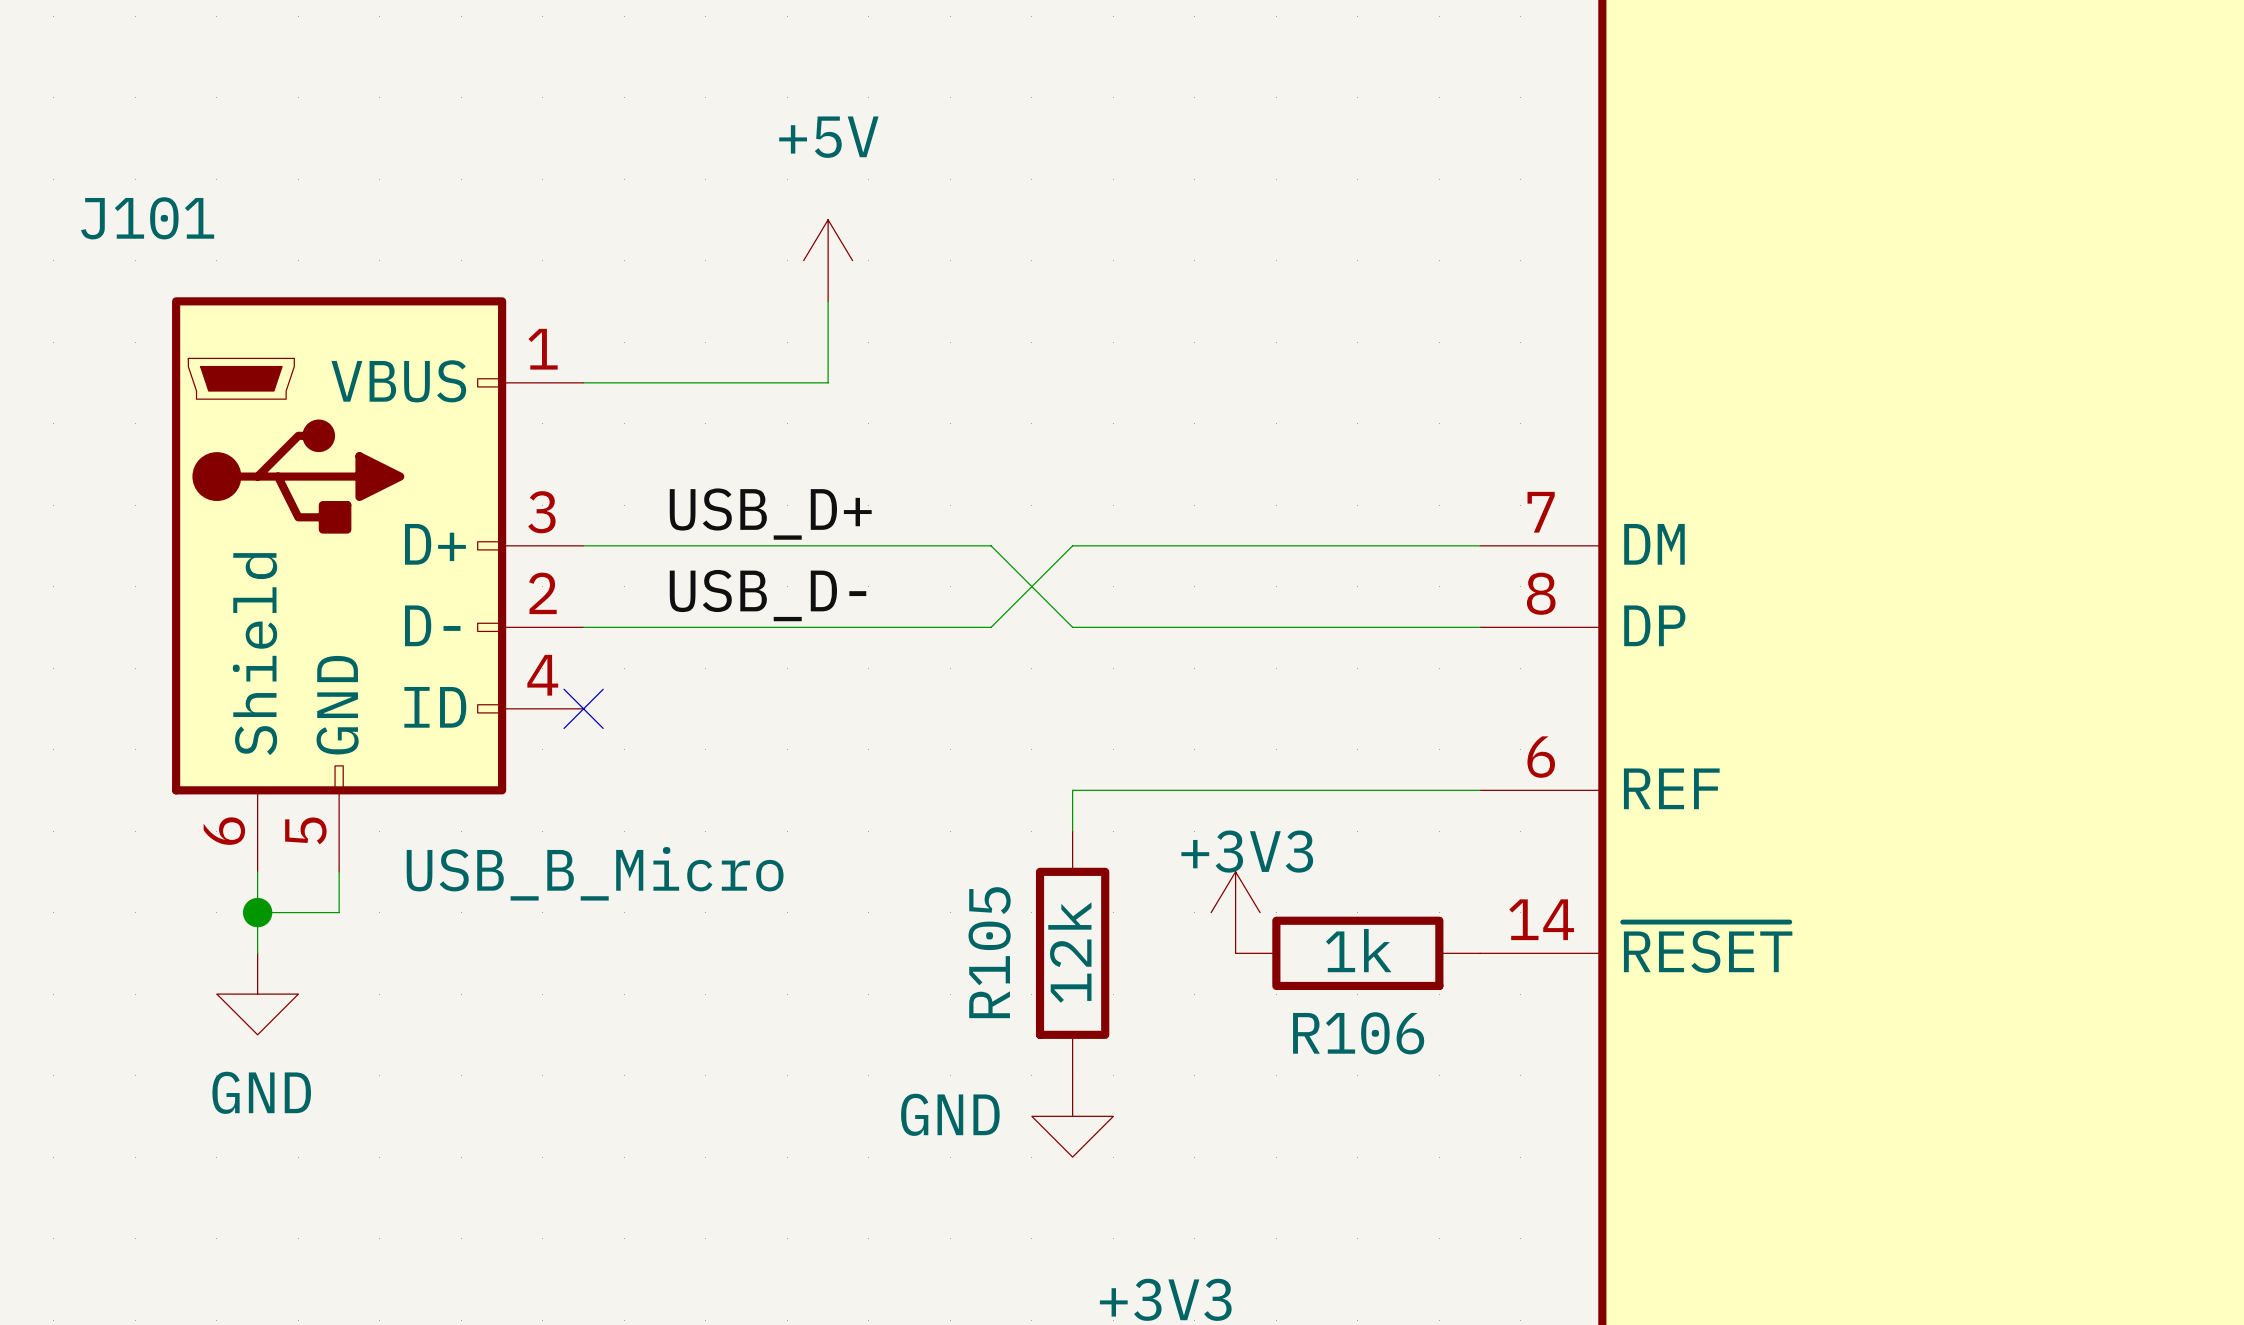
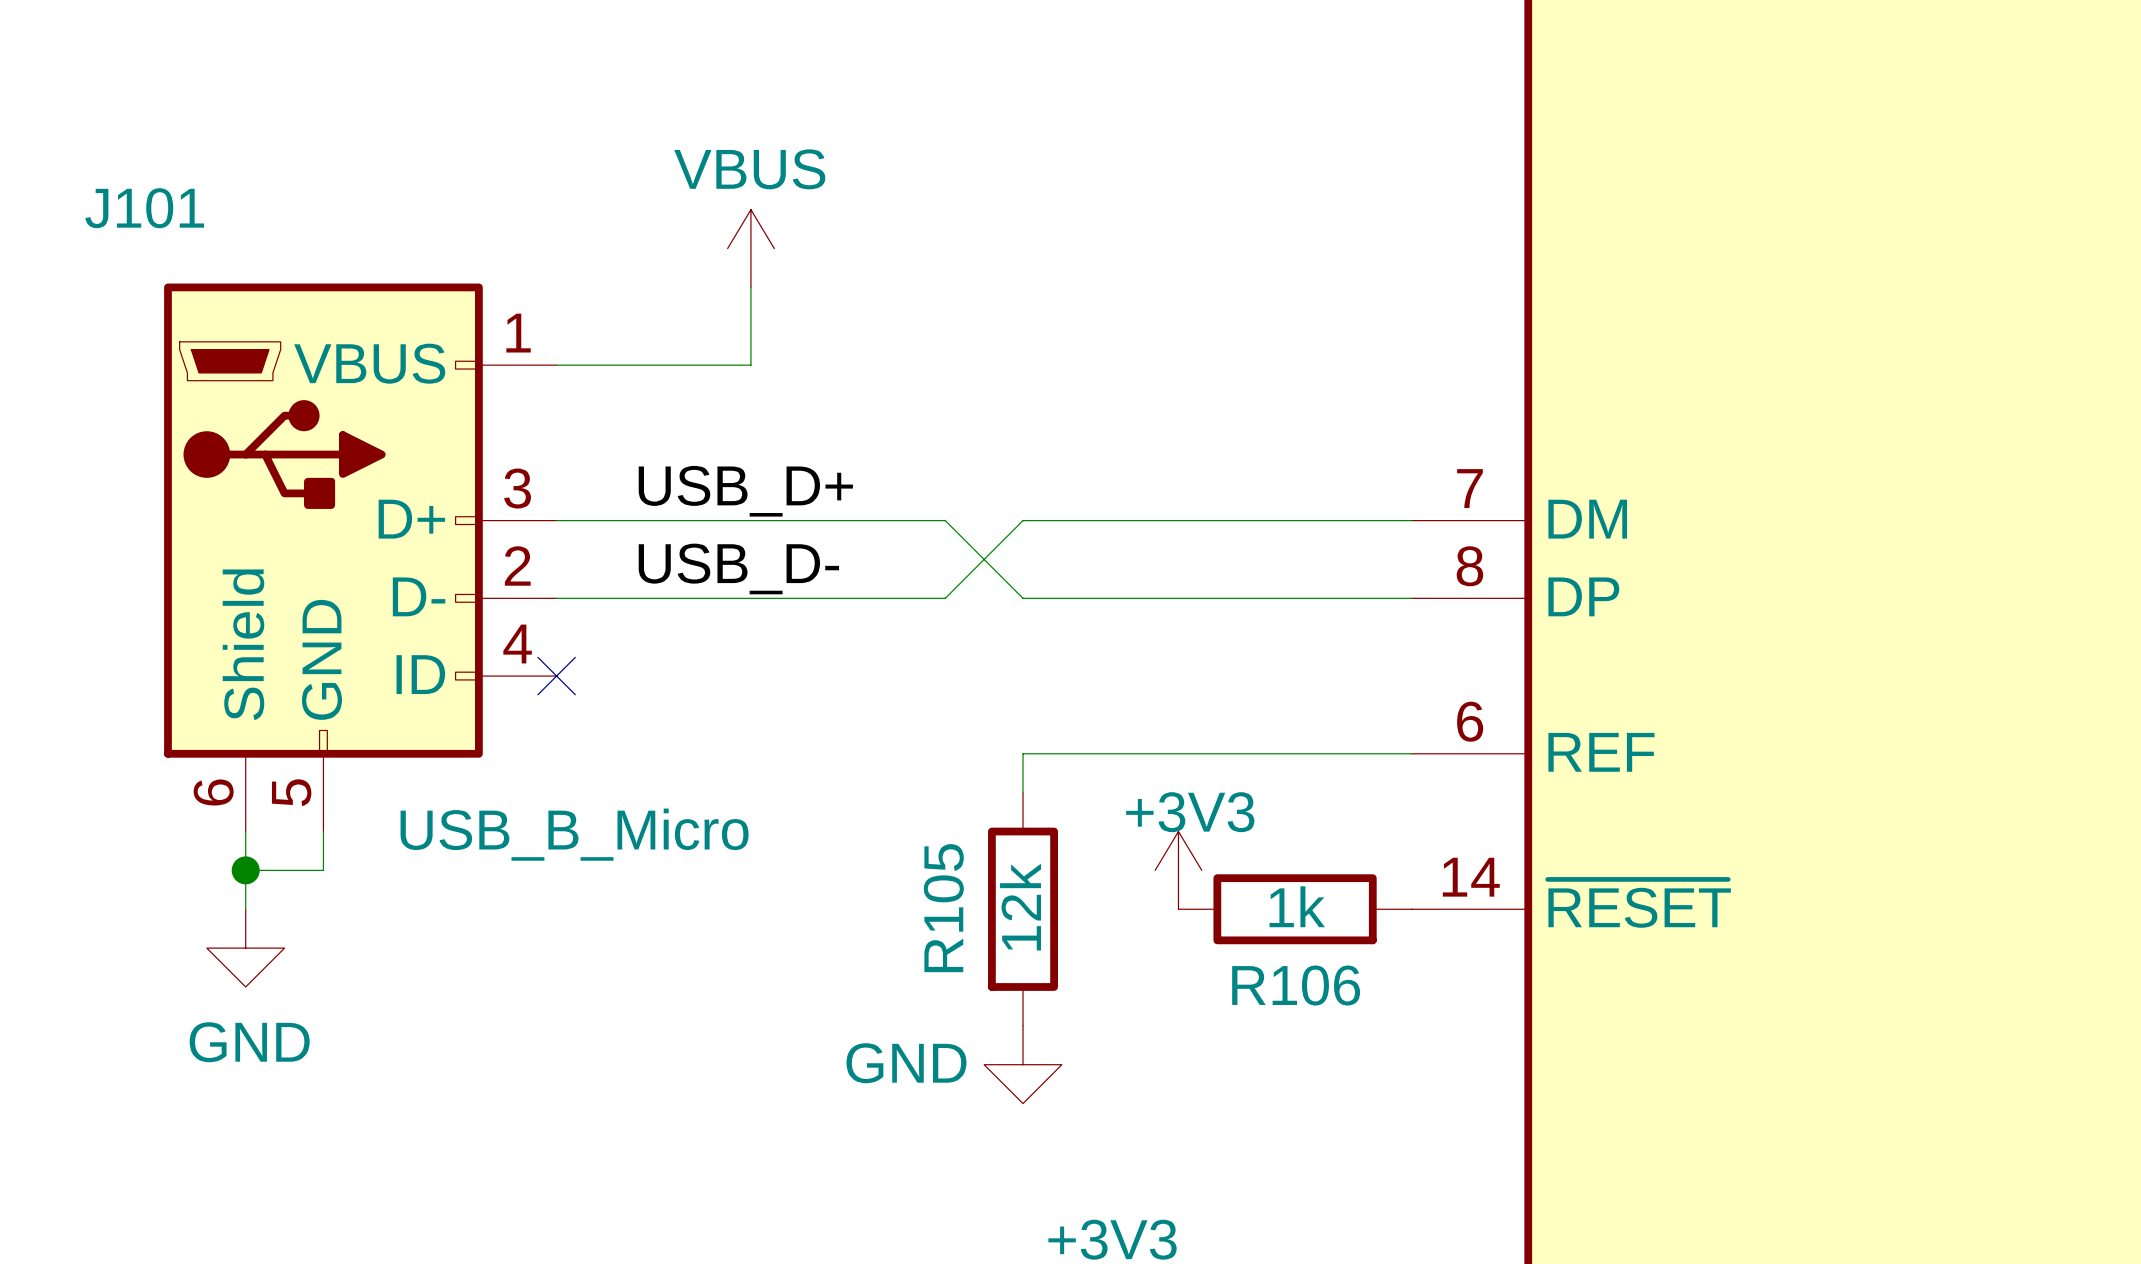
power symbol: none -> VBUS (750, 248)
power symbol: +5V (828, 260) -> none
wire: (828, 301) (828, 382) (787, 382) -> (750, 287) (750, 365)

